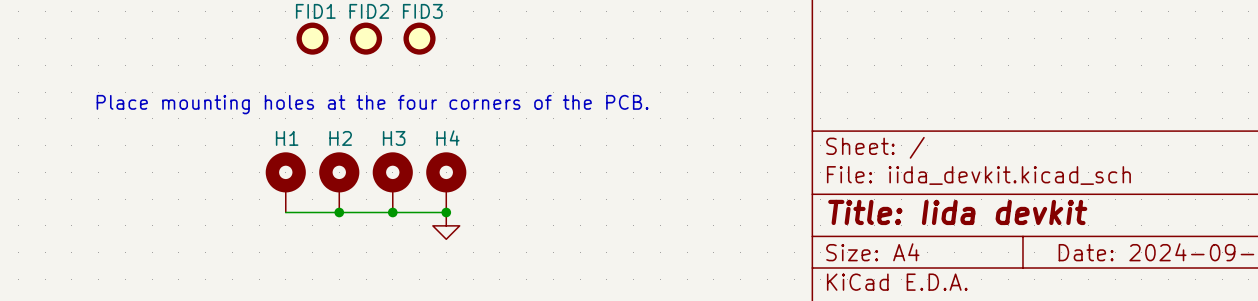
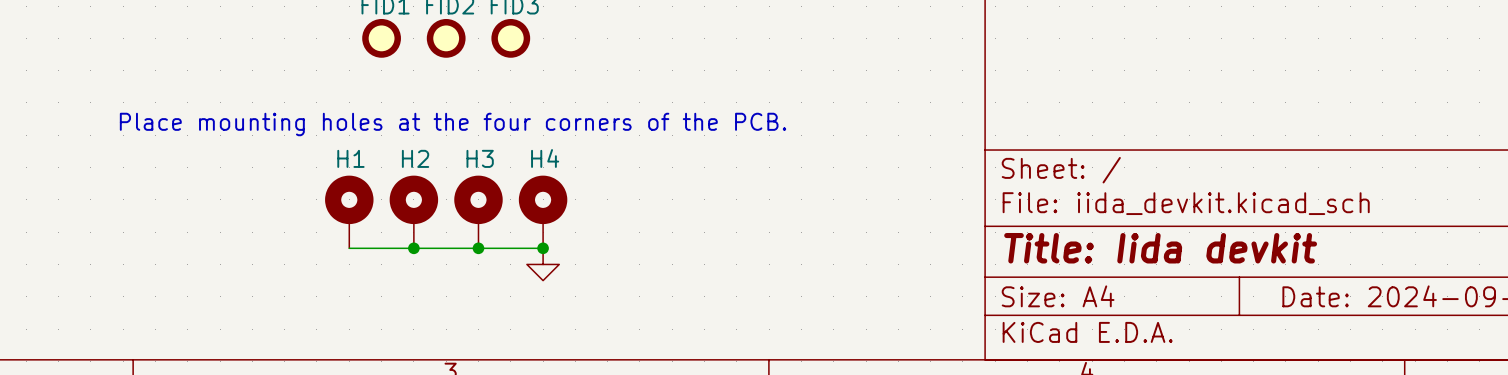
text: Place mounting holes at the four corners of the PCB. (372, 104) -> none
text: none -> Place mounting holes at the four corners of the PCB. (453, 124)

